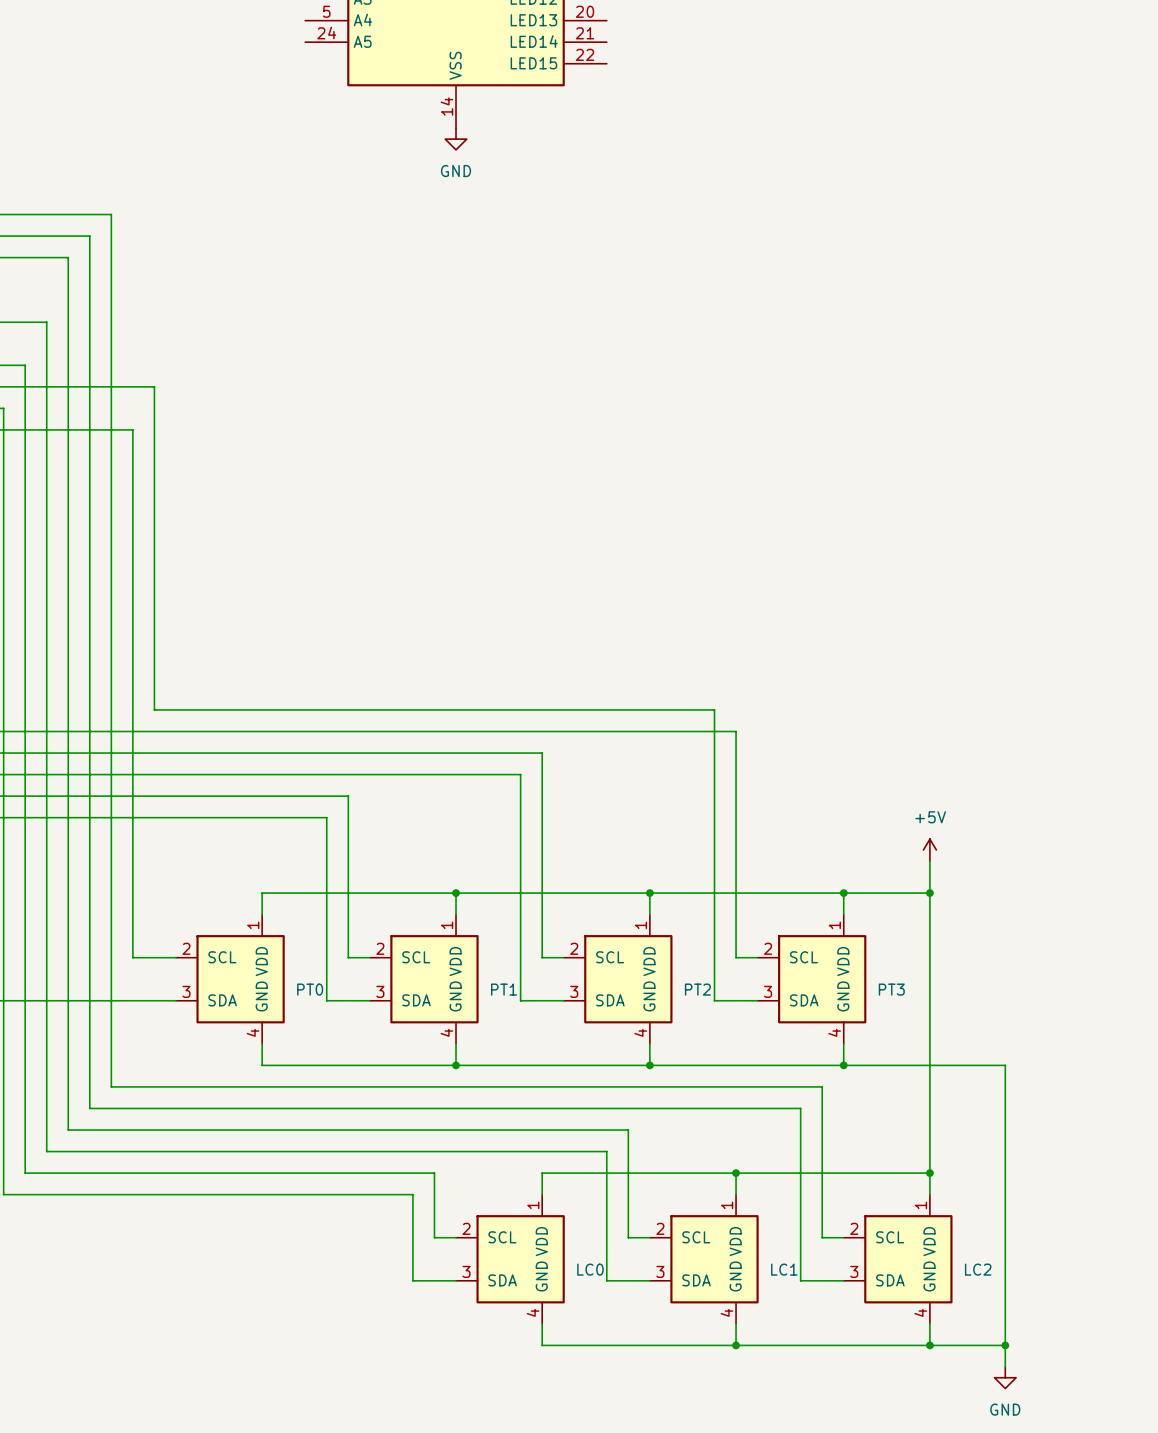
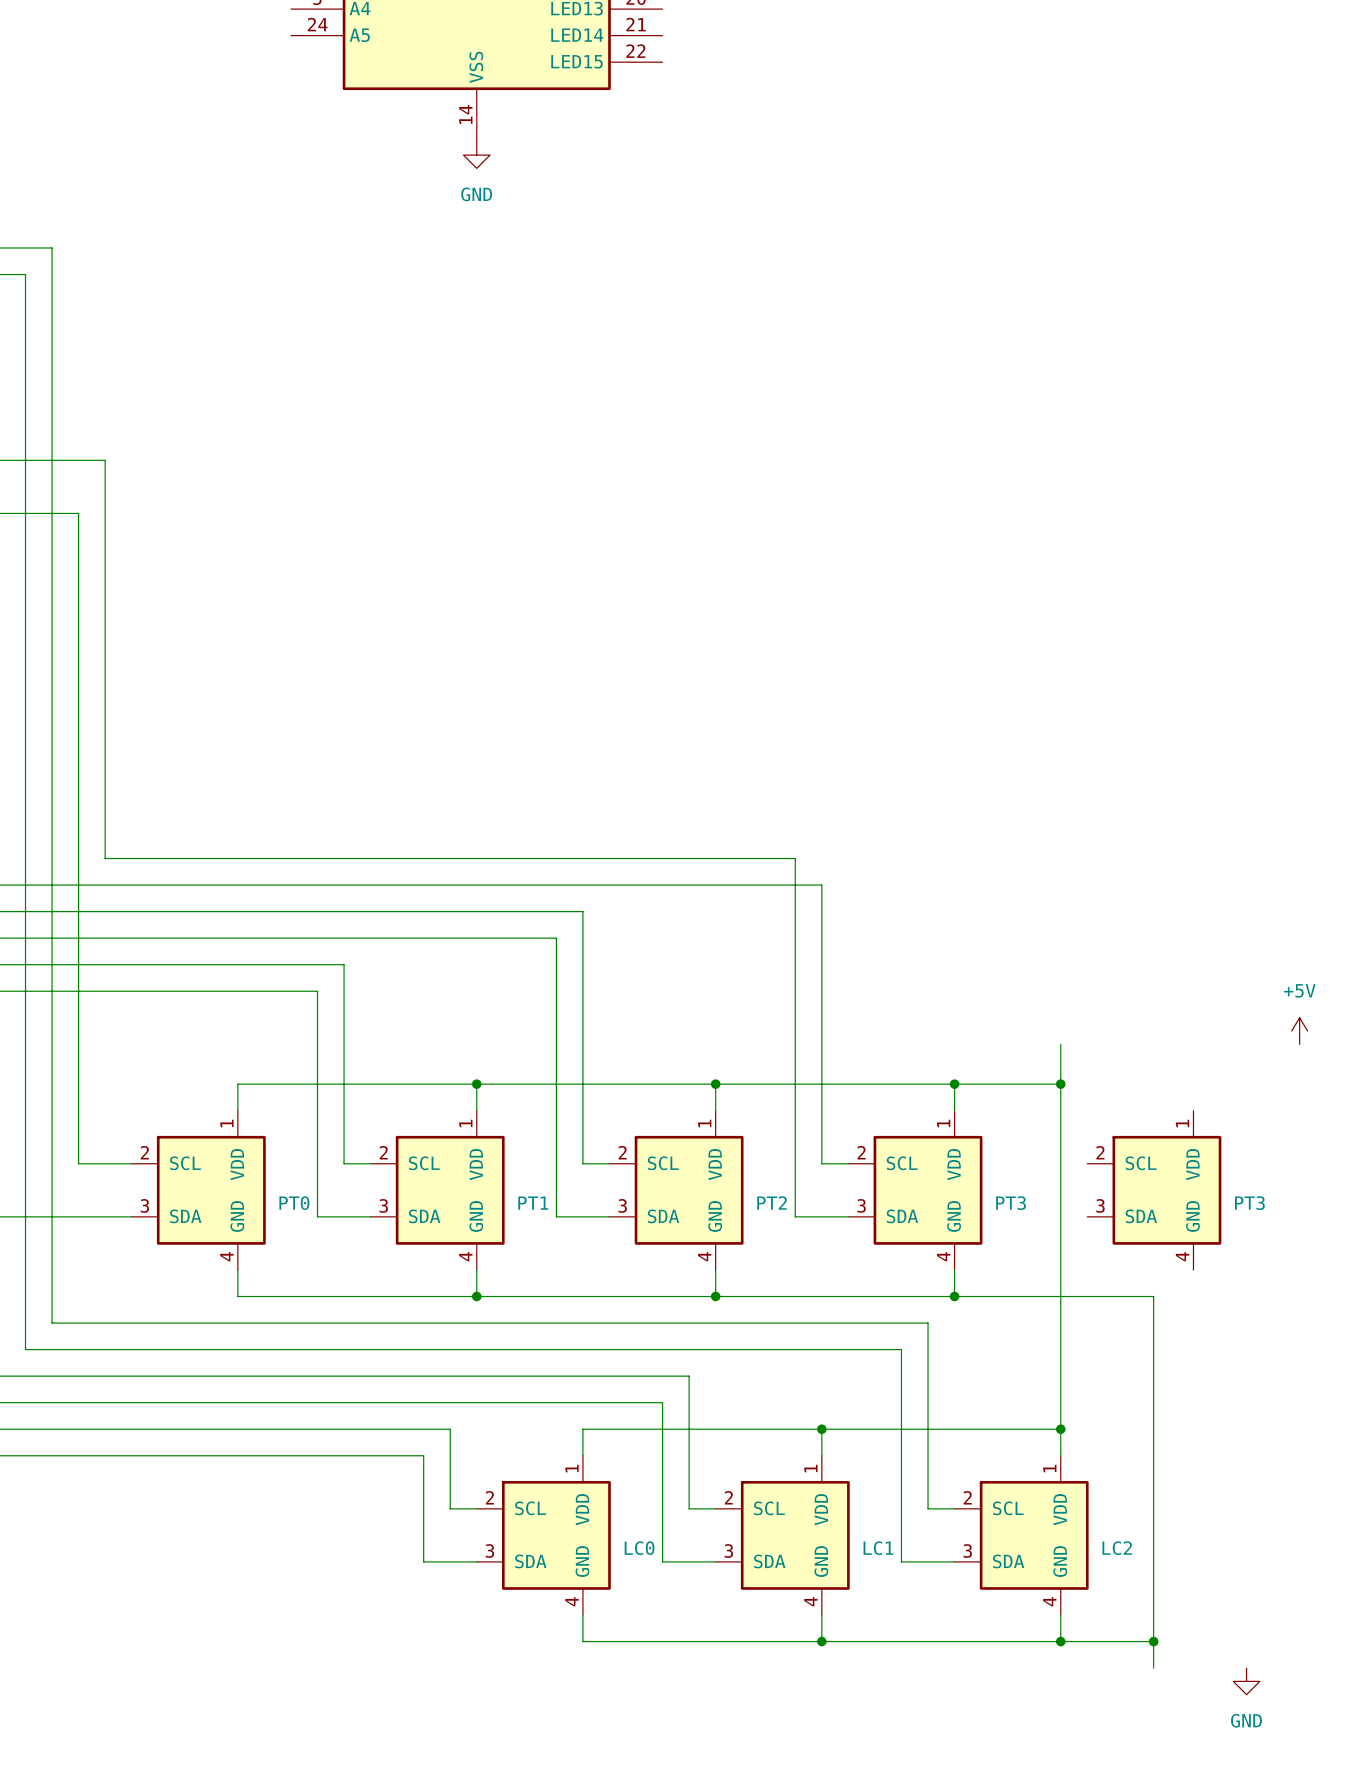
power symbol position: +5V (929, 849) -> +5V (1299, 1031)
part: none -> PT3 (1154, 1190)
power symbol position: GND (1005, 1377) -> GND (1246, 1681)

